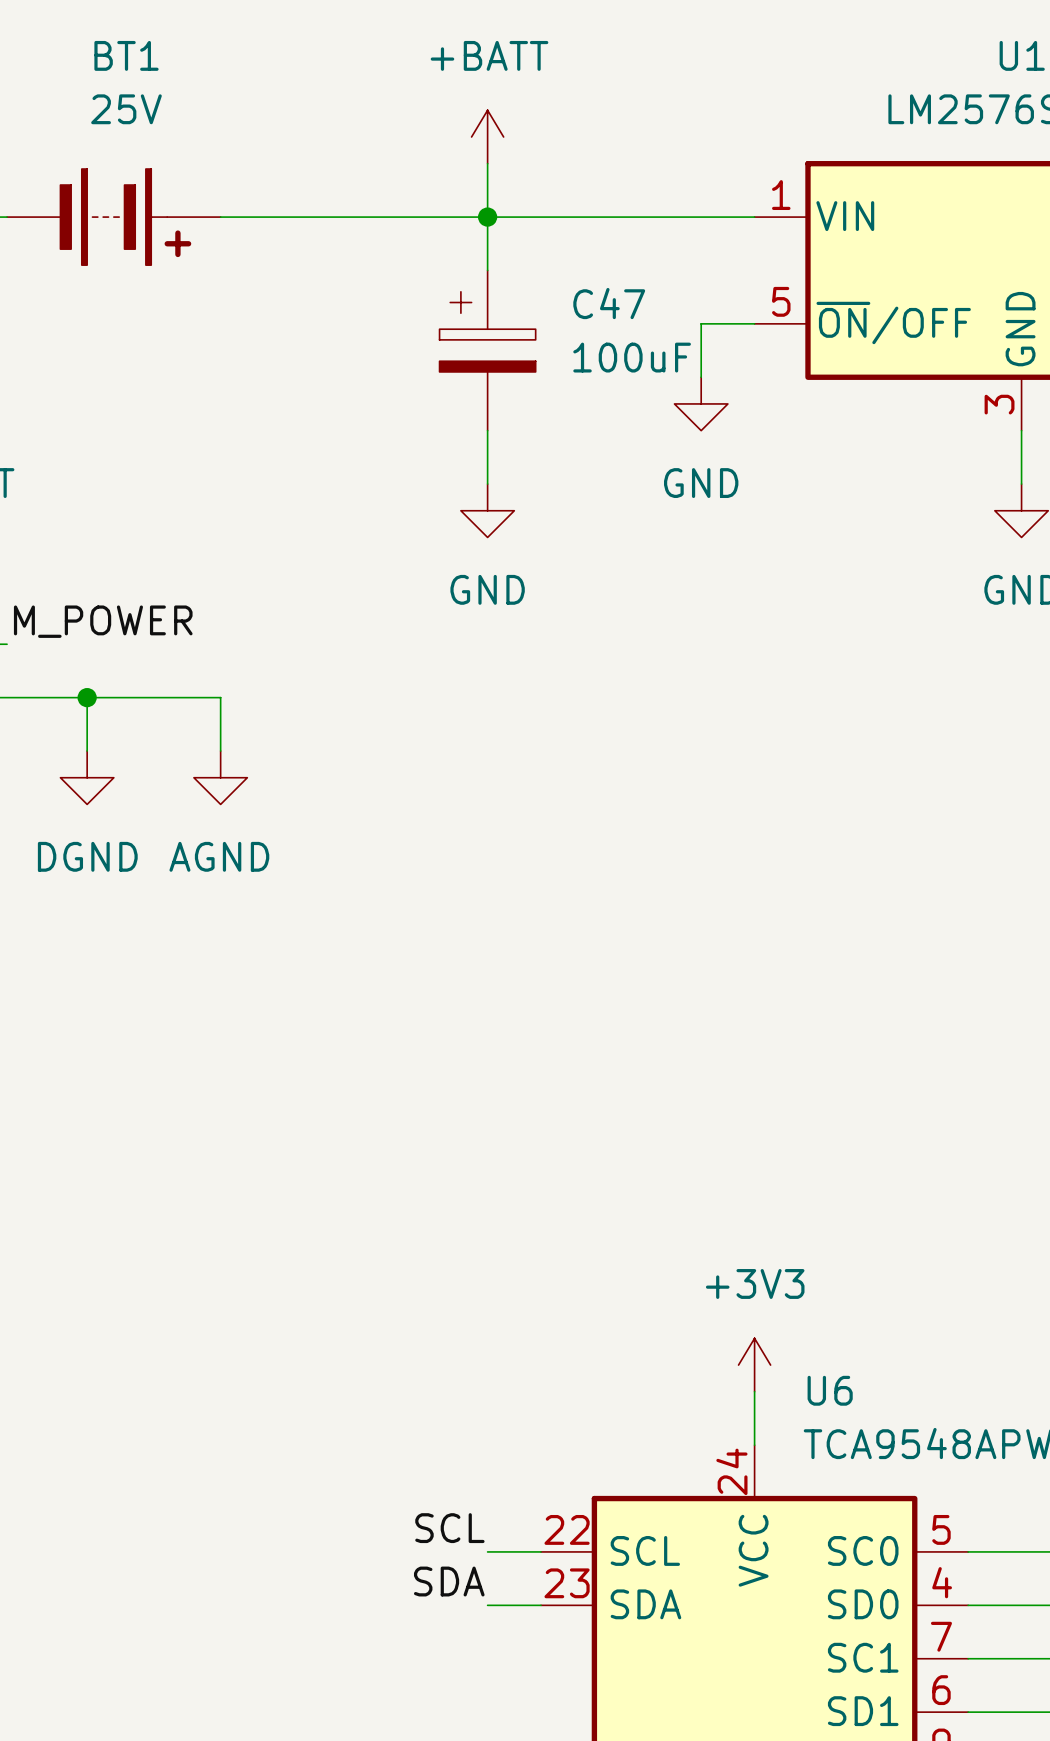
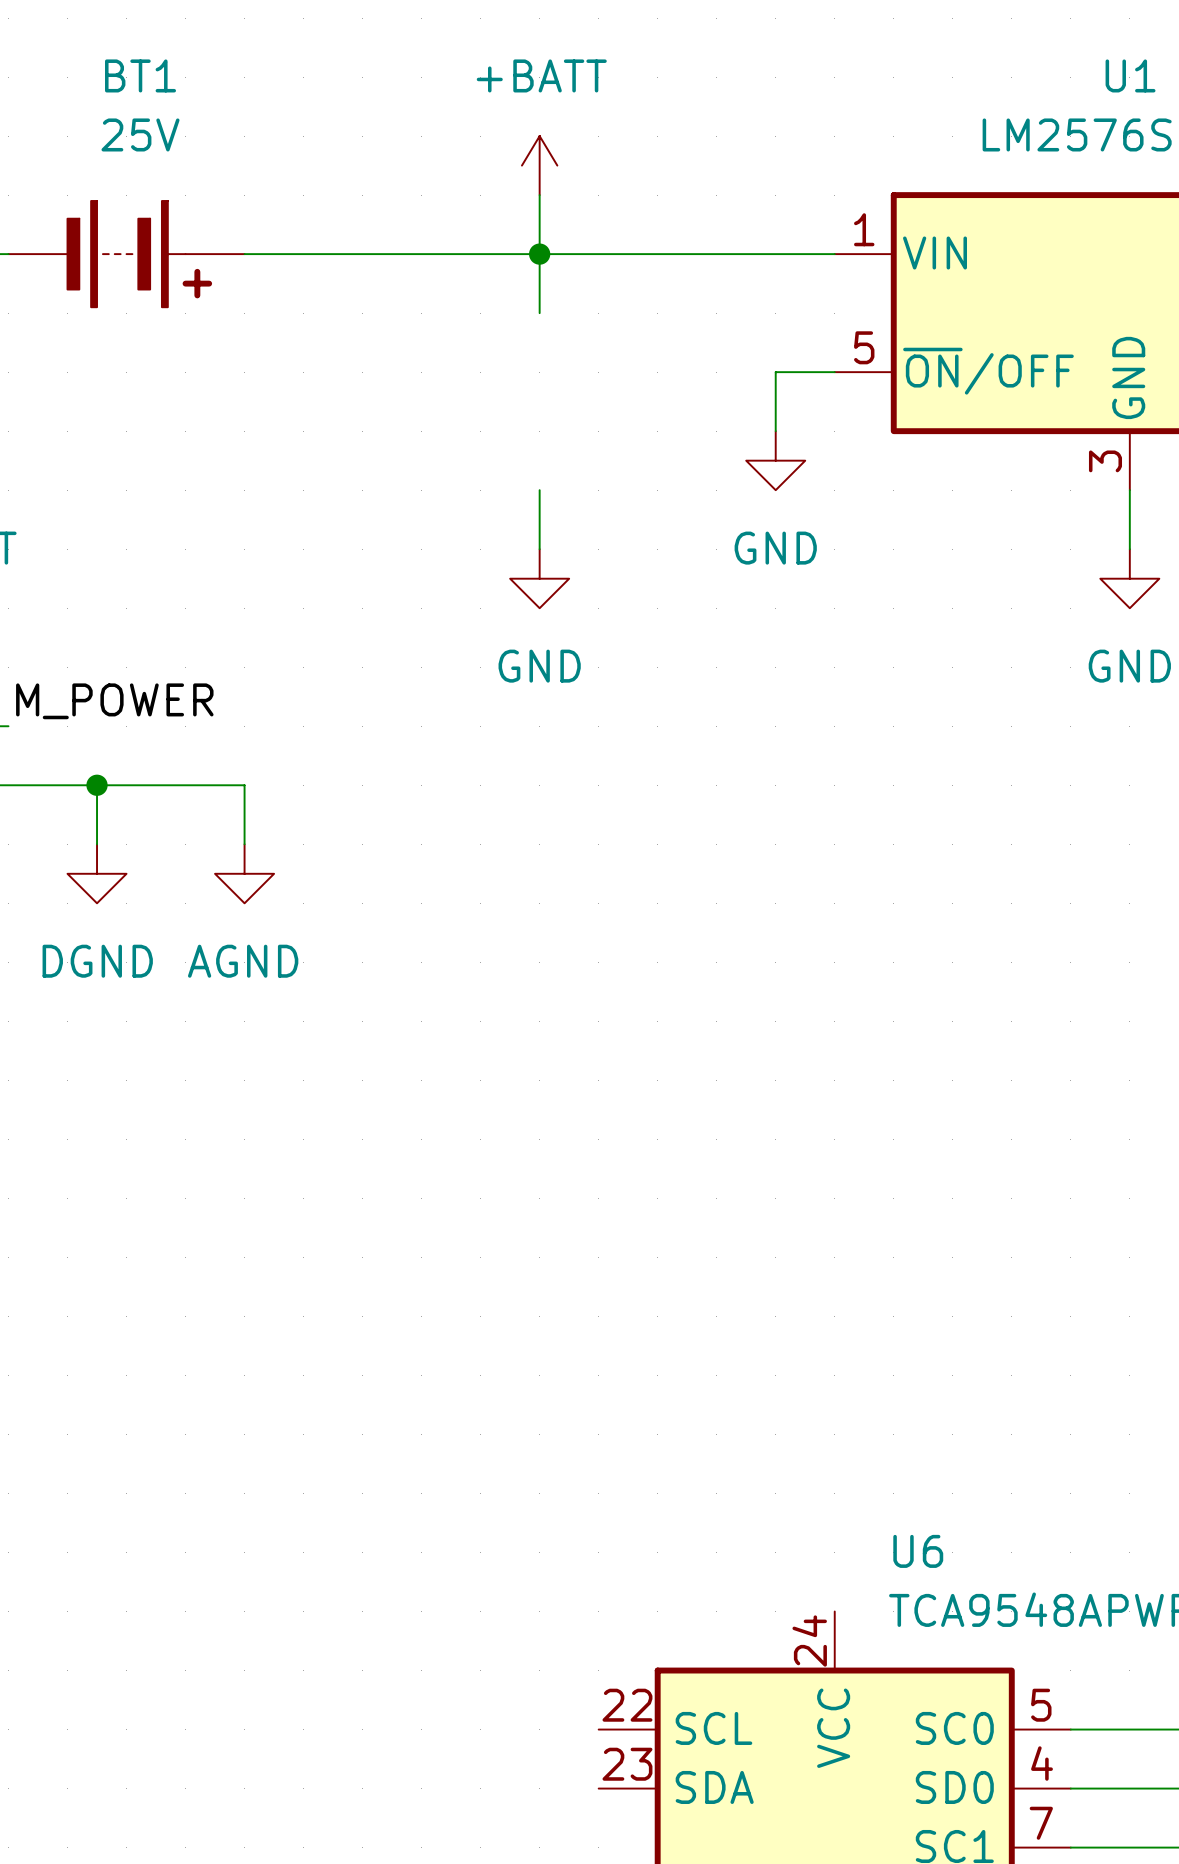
C47: 100uF (487, 350) -> none
power symbol: +3V3 (754, 1365) -> none
wire: (754, 1391) (754, 1445) -> none
label: SCL (449, 1528) -> none
wire: (487, 1551) (541, 1551) -> none
label: SDA (449, 1581) -> none
wire: (487, 1605) (541, 1605) -> none

